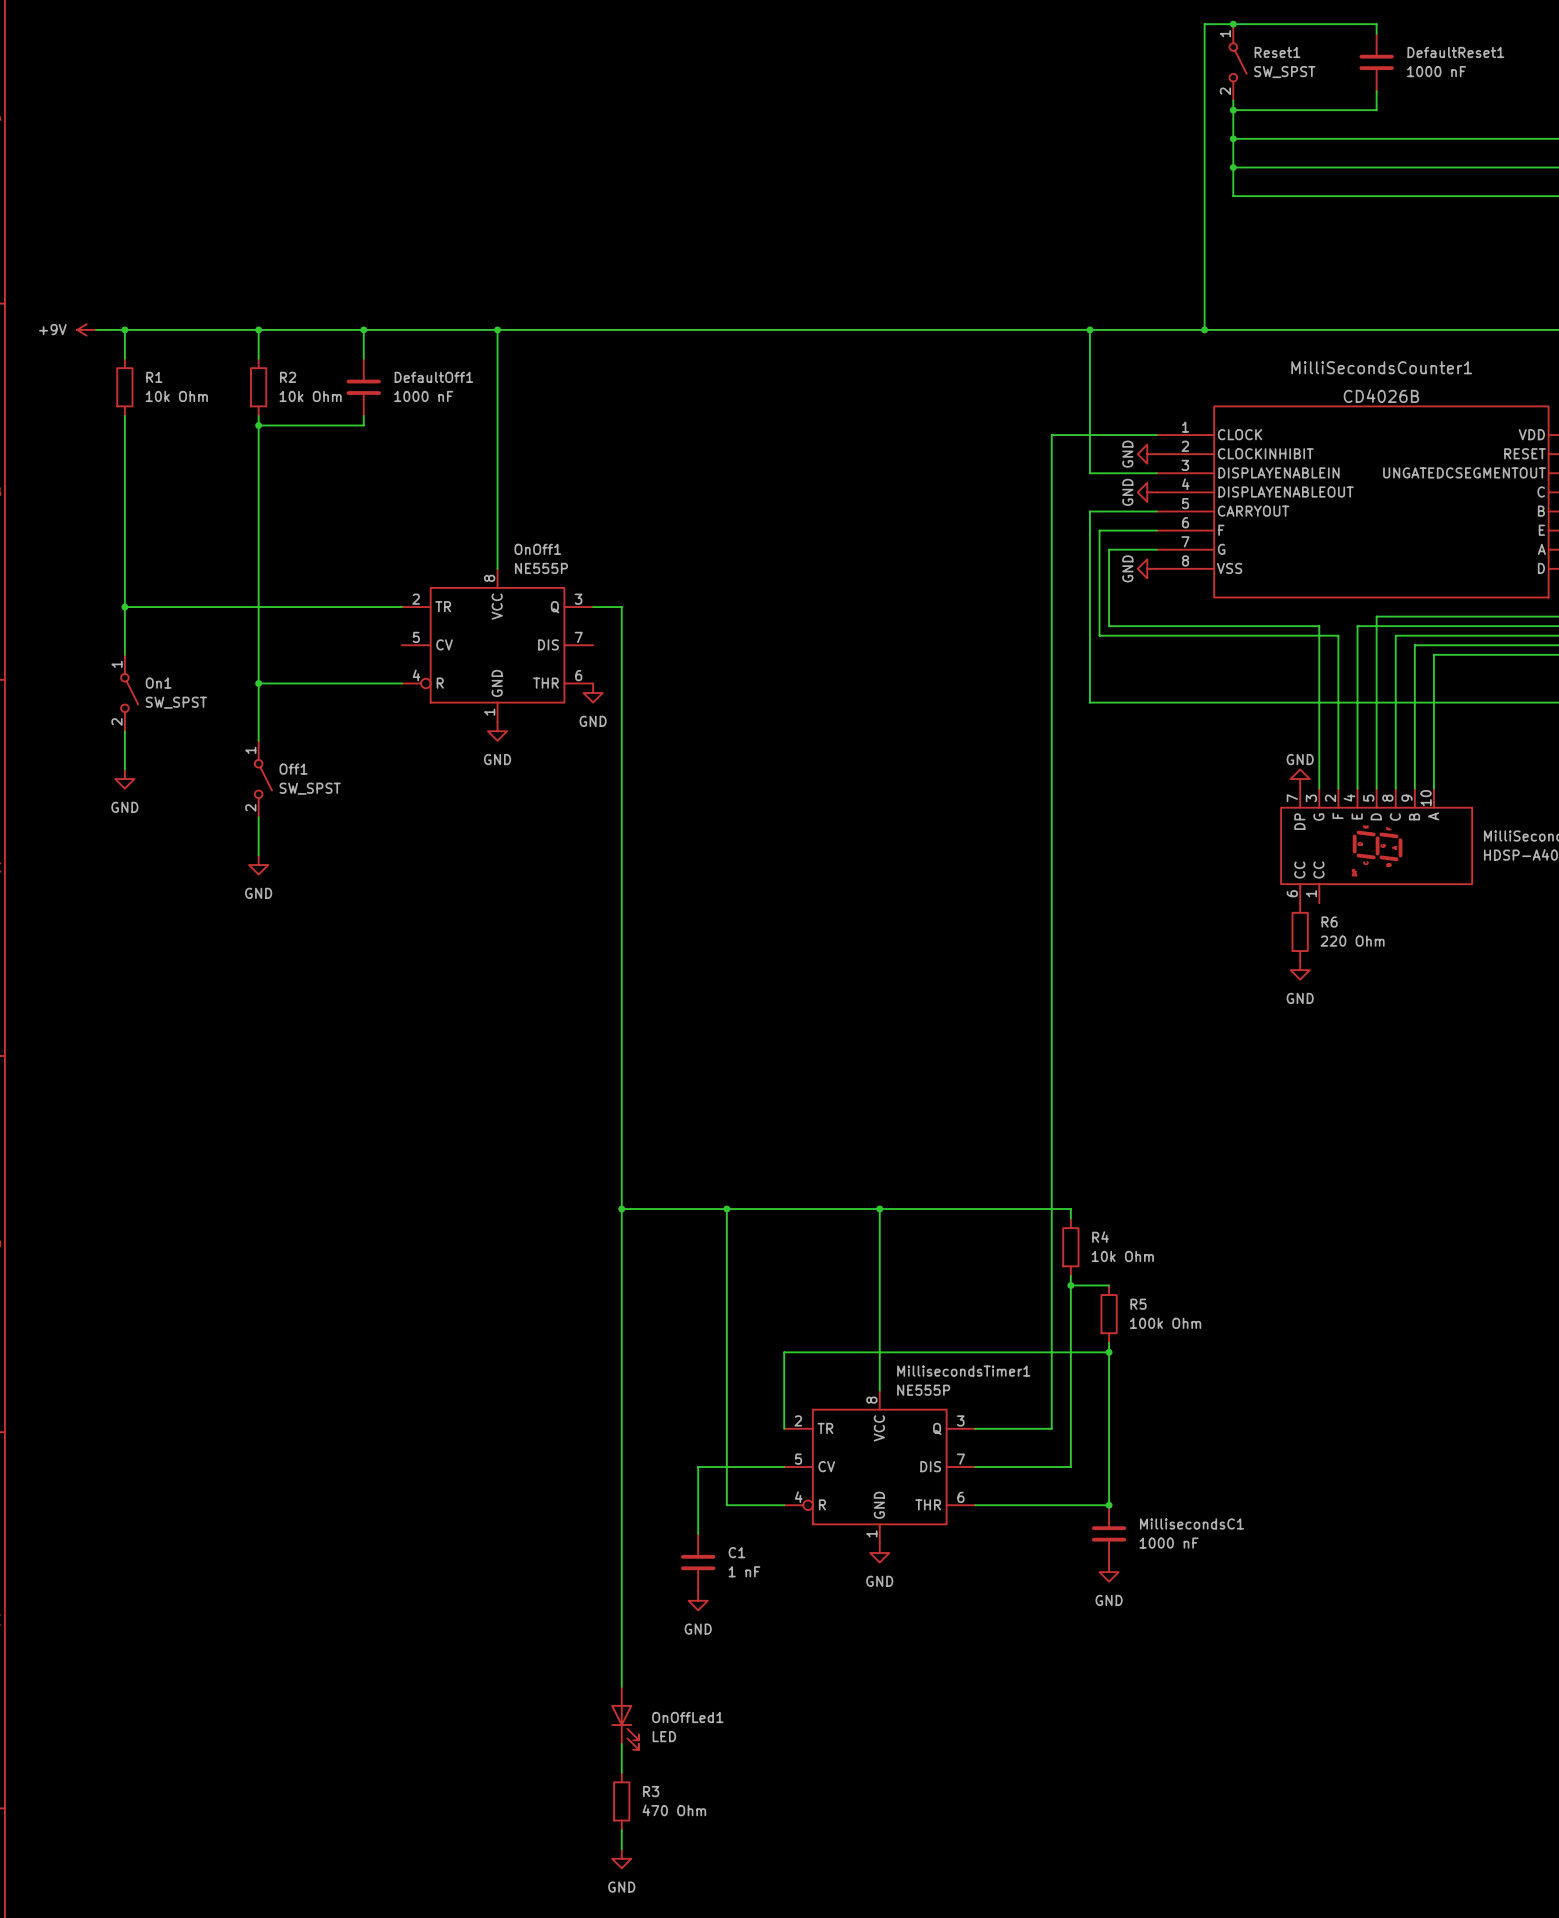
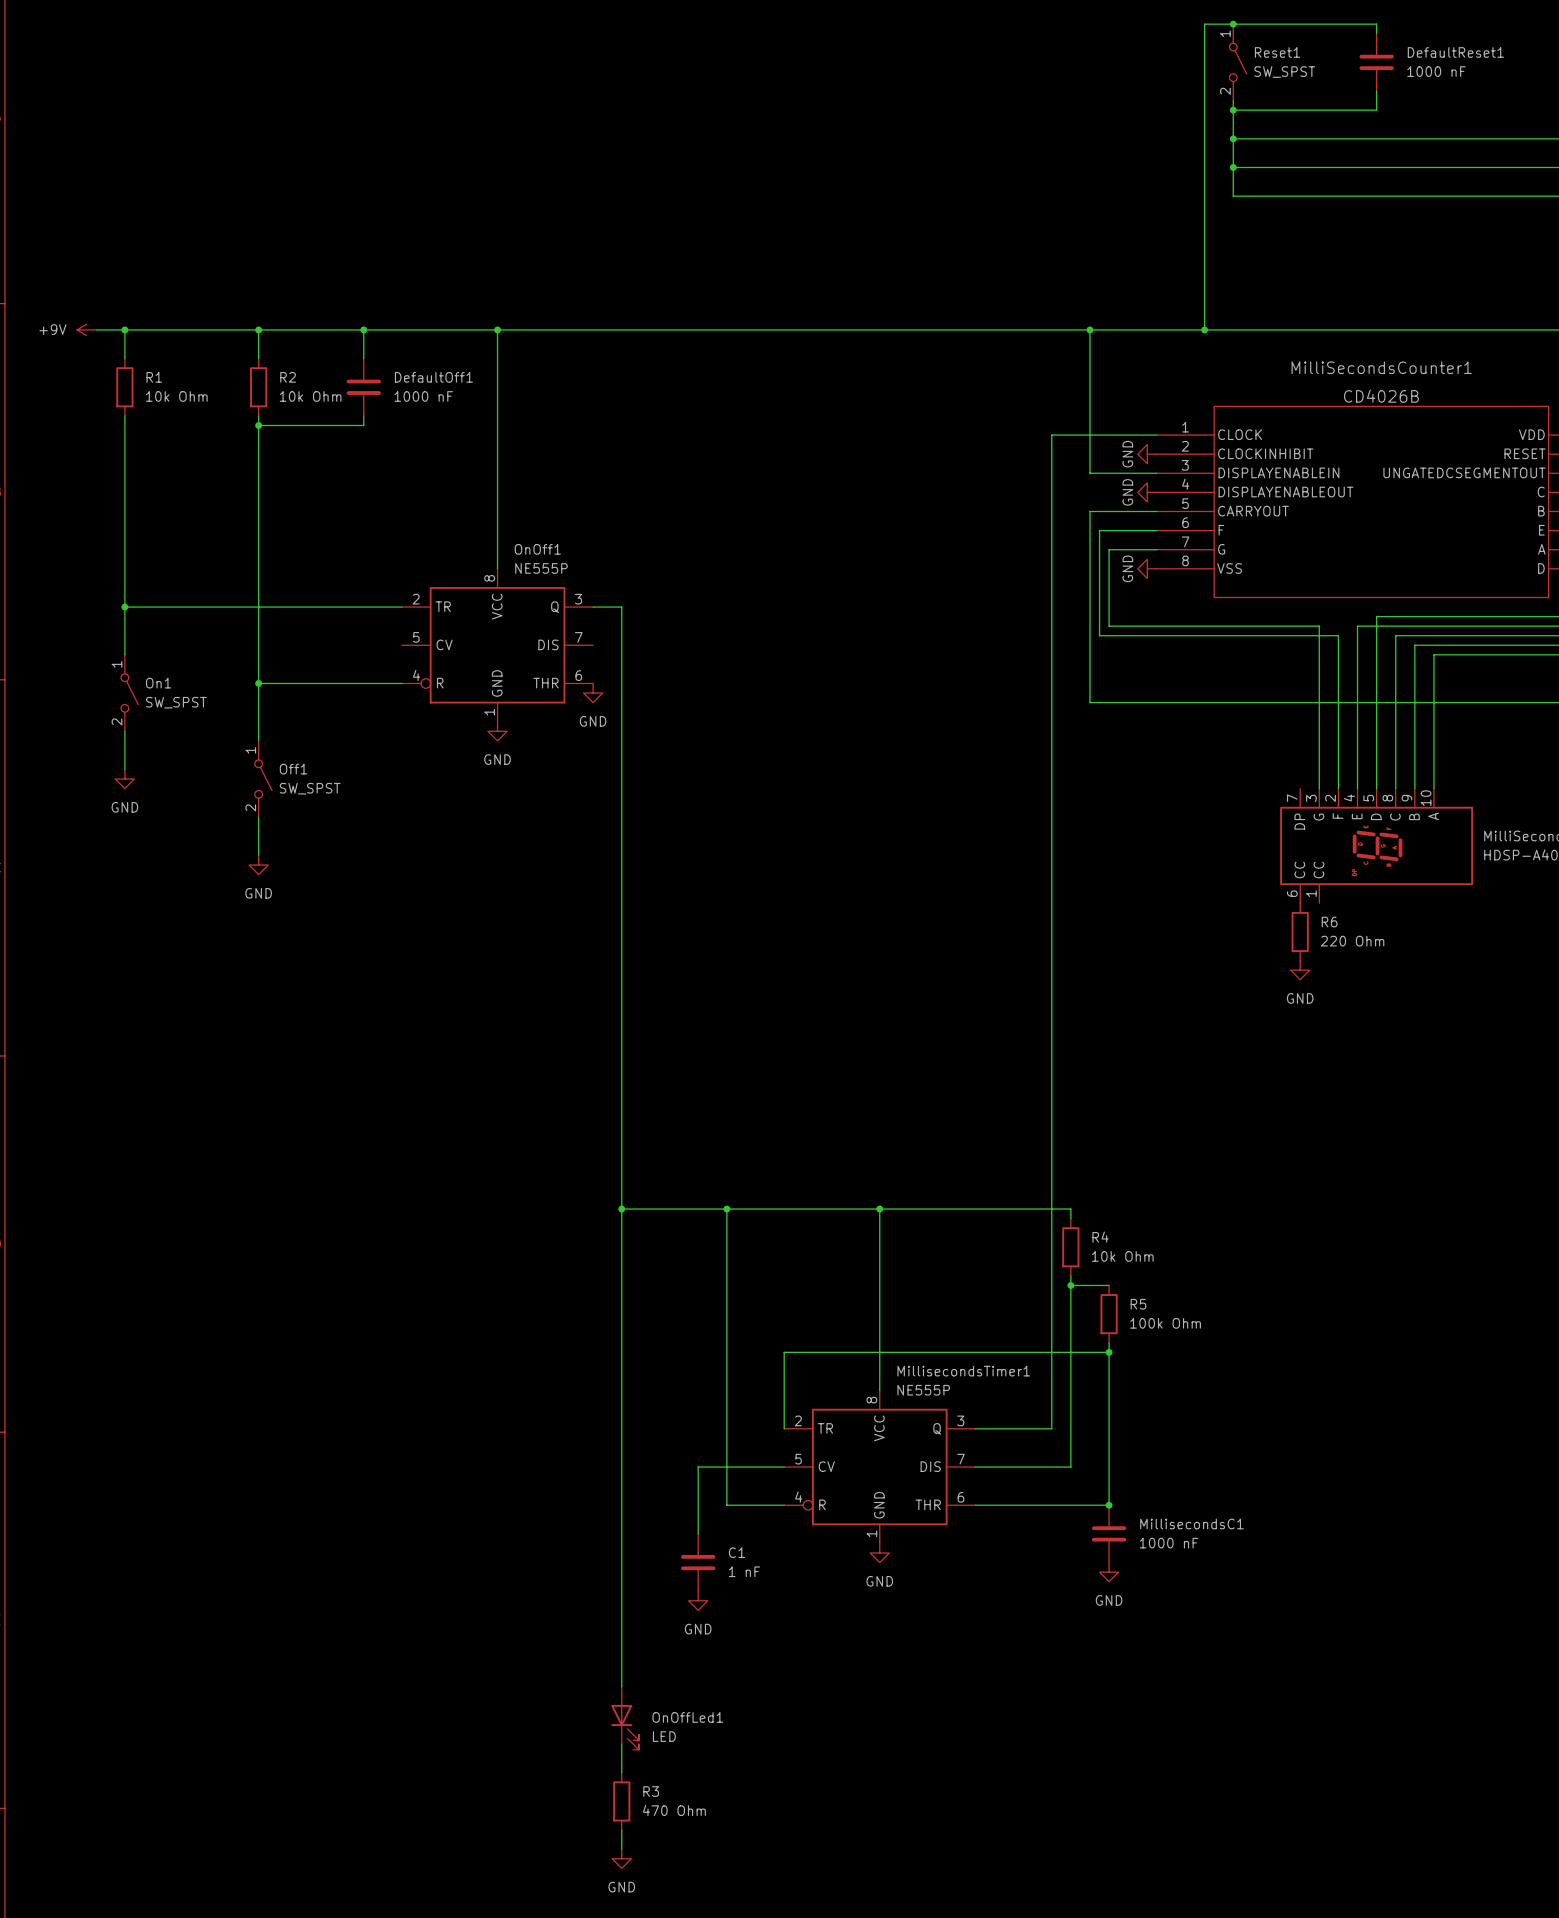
power symbol: GND (1300, 779) -> none

